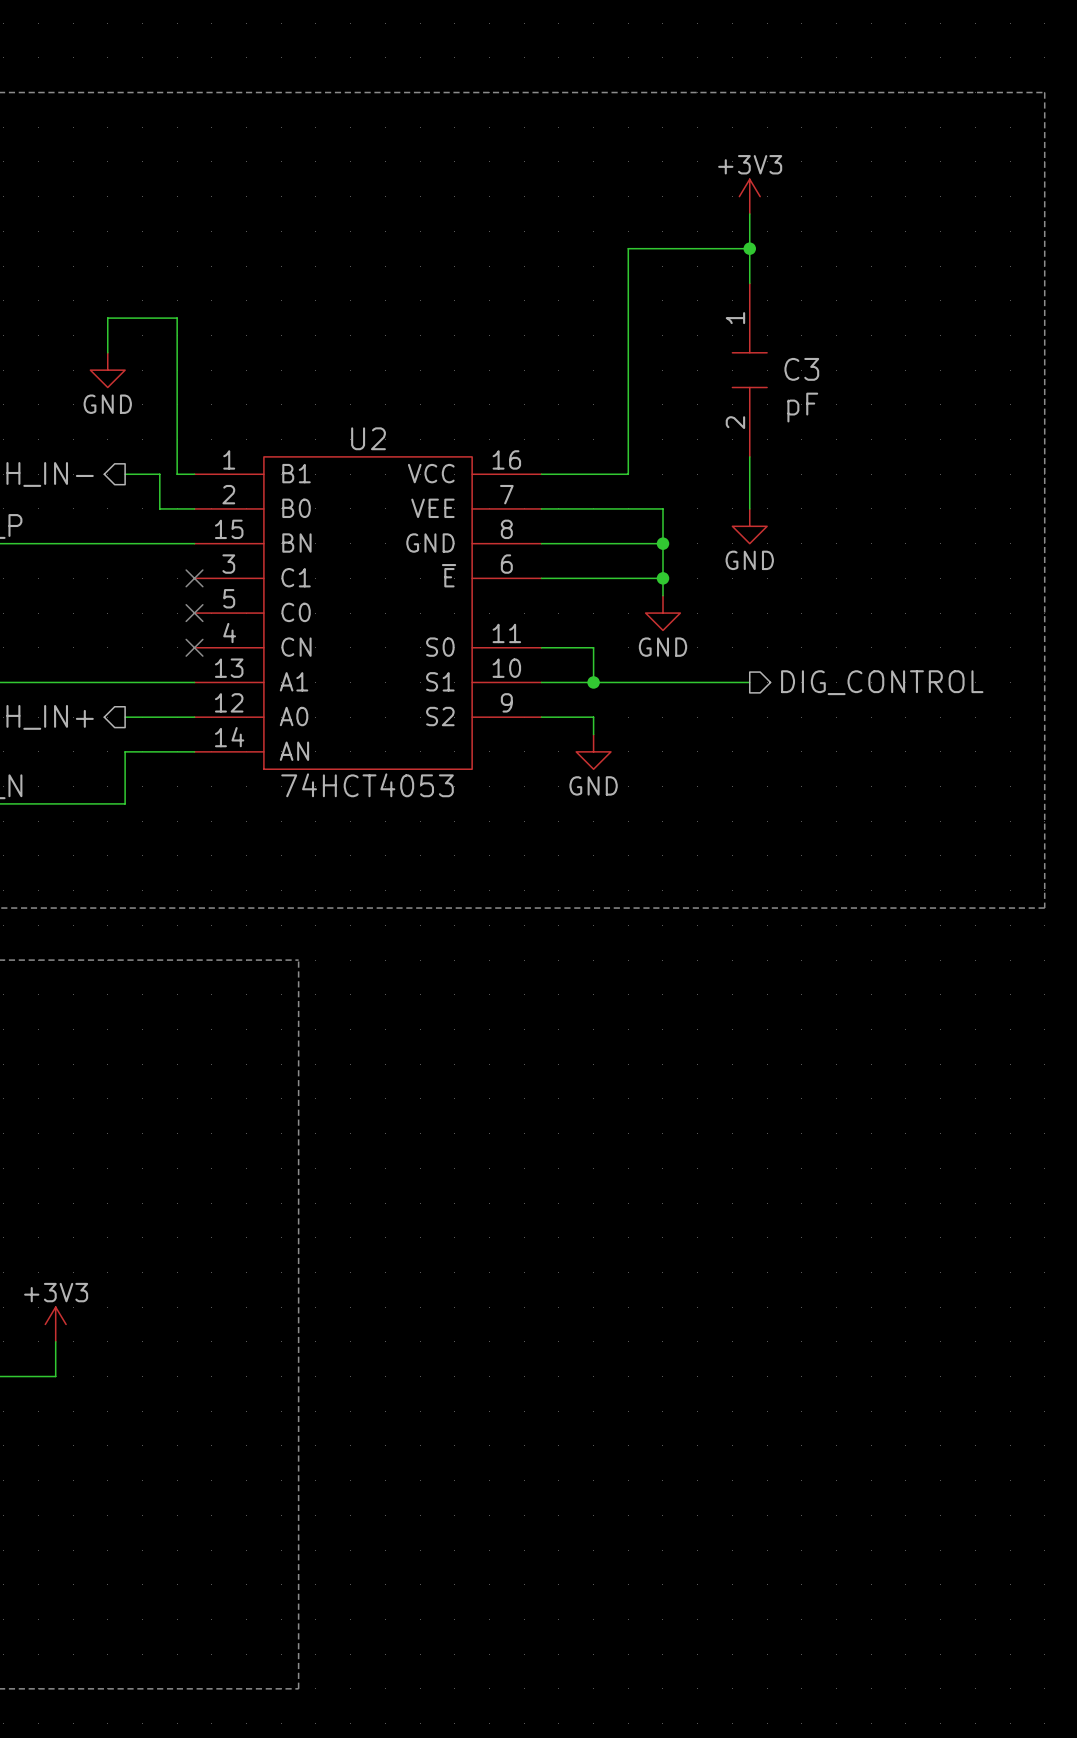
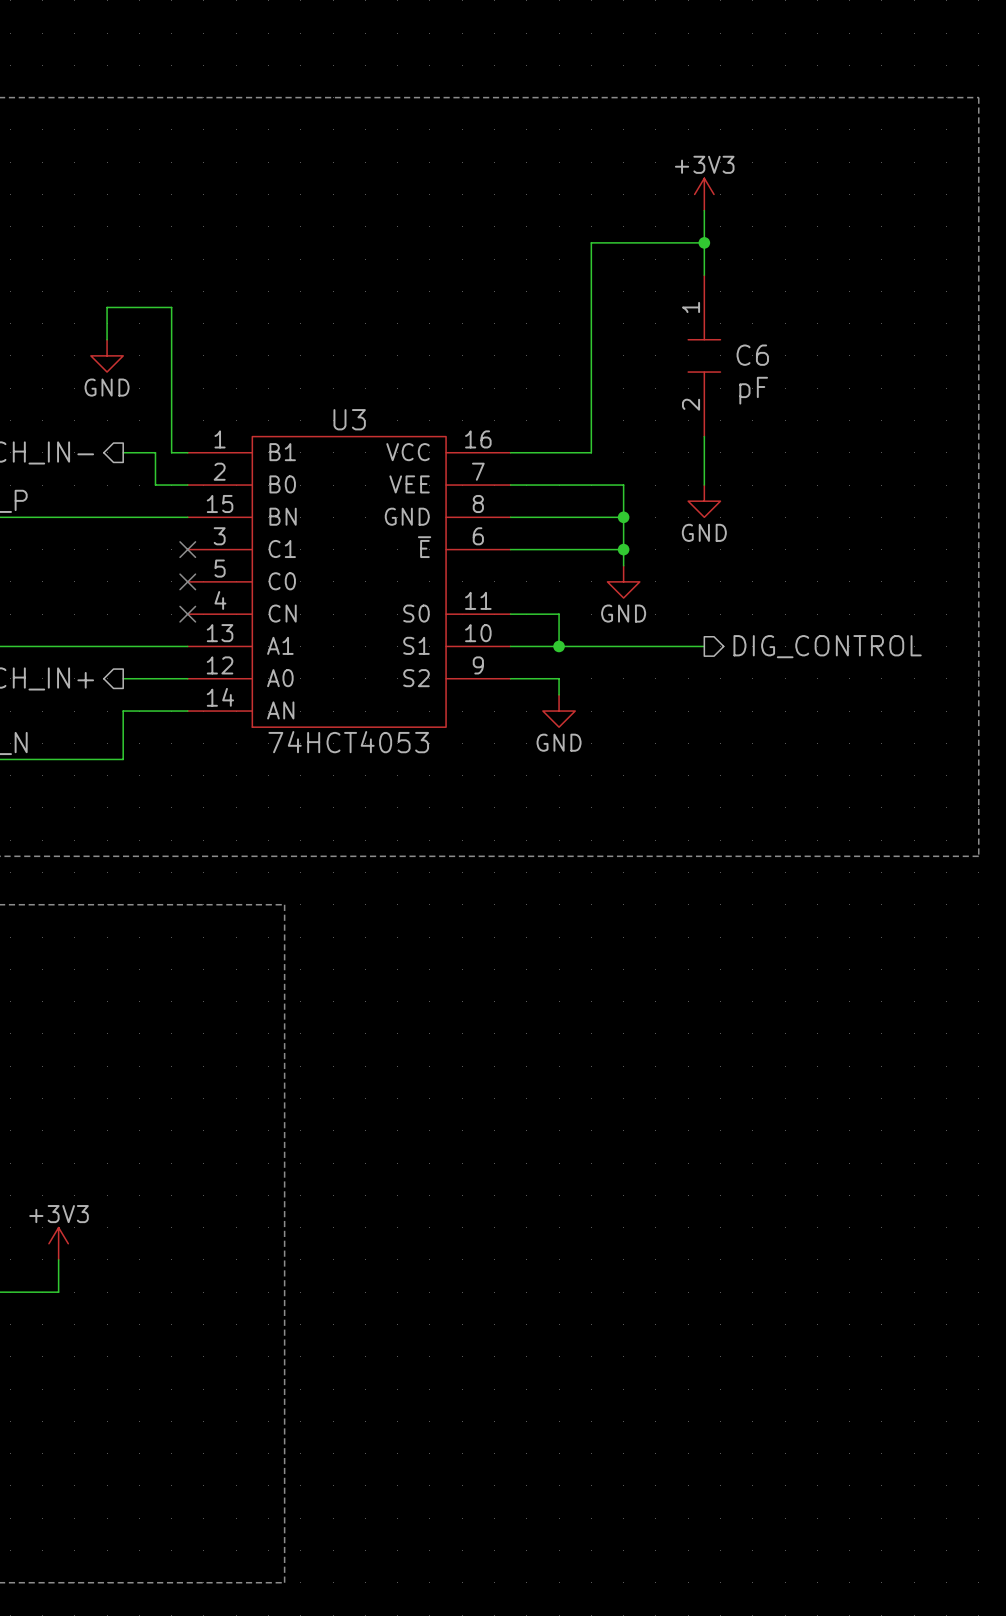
C3 name: C3 (801, 369) -> C6 (752, 355)
U2 name: U2 (368, 438) -> U3 (349, 419)

